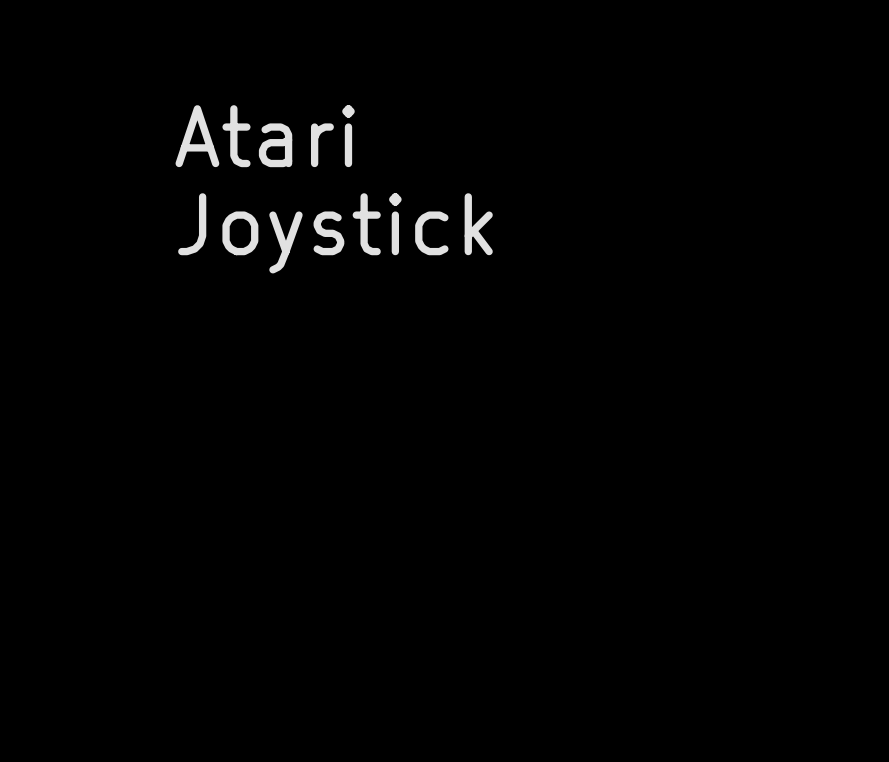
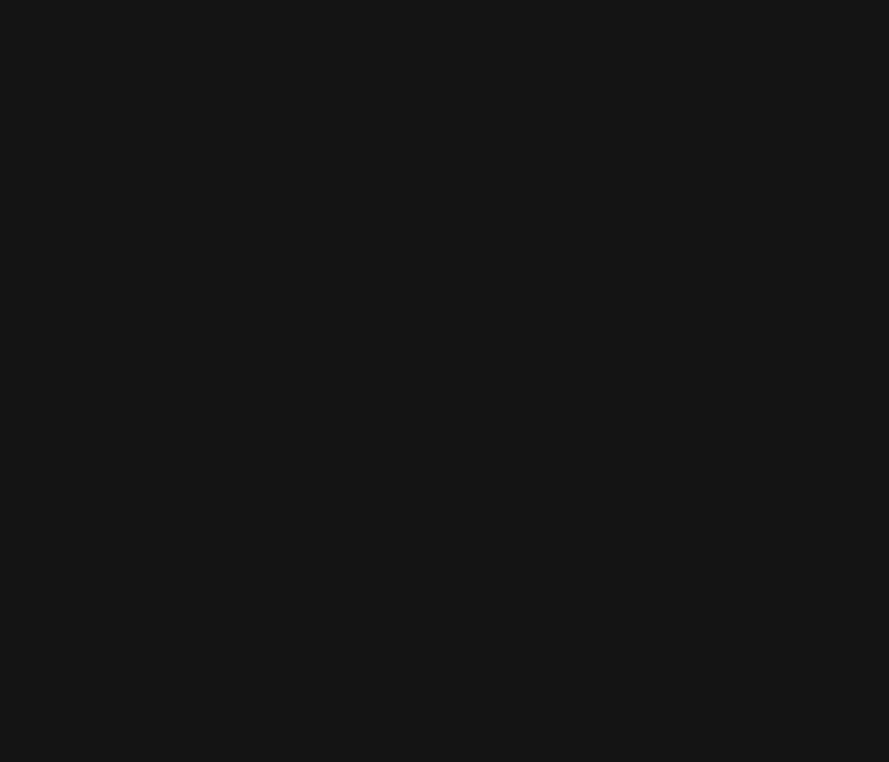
text: Atari (265, 136) -> none
text: Joystick (335, 233) -> none

